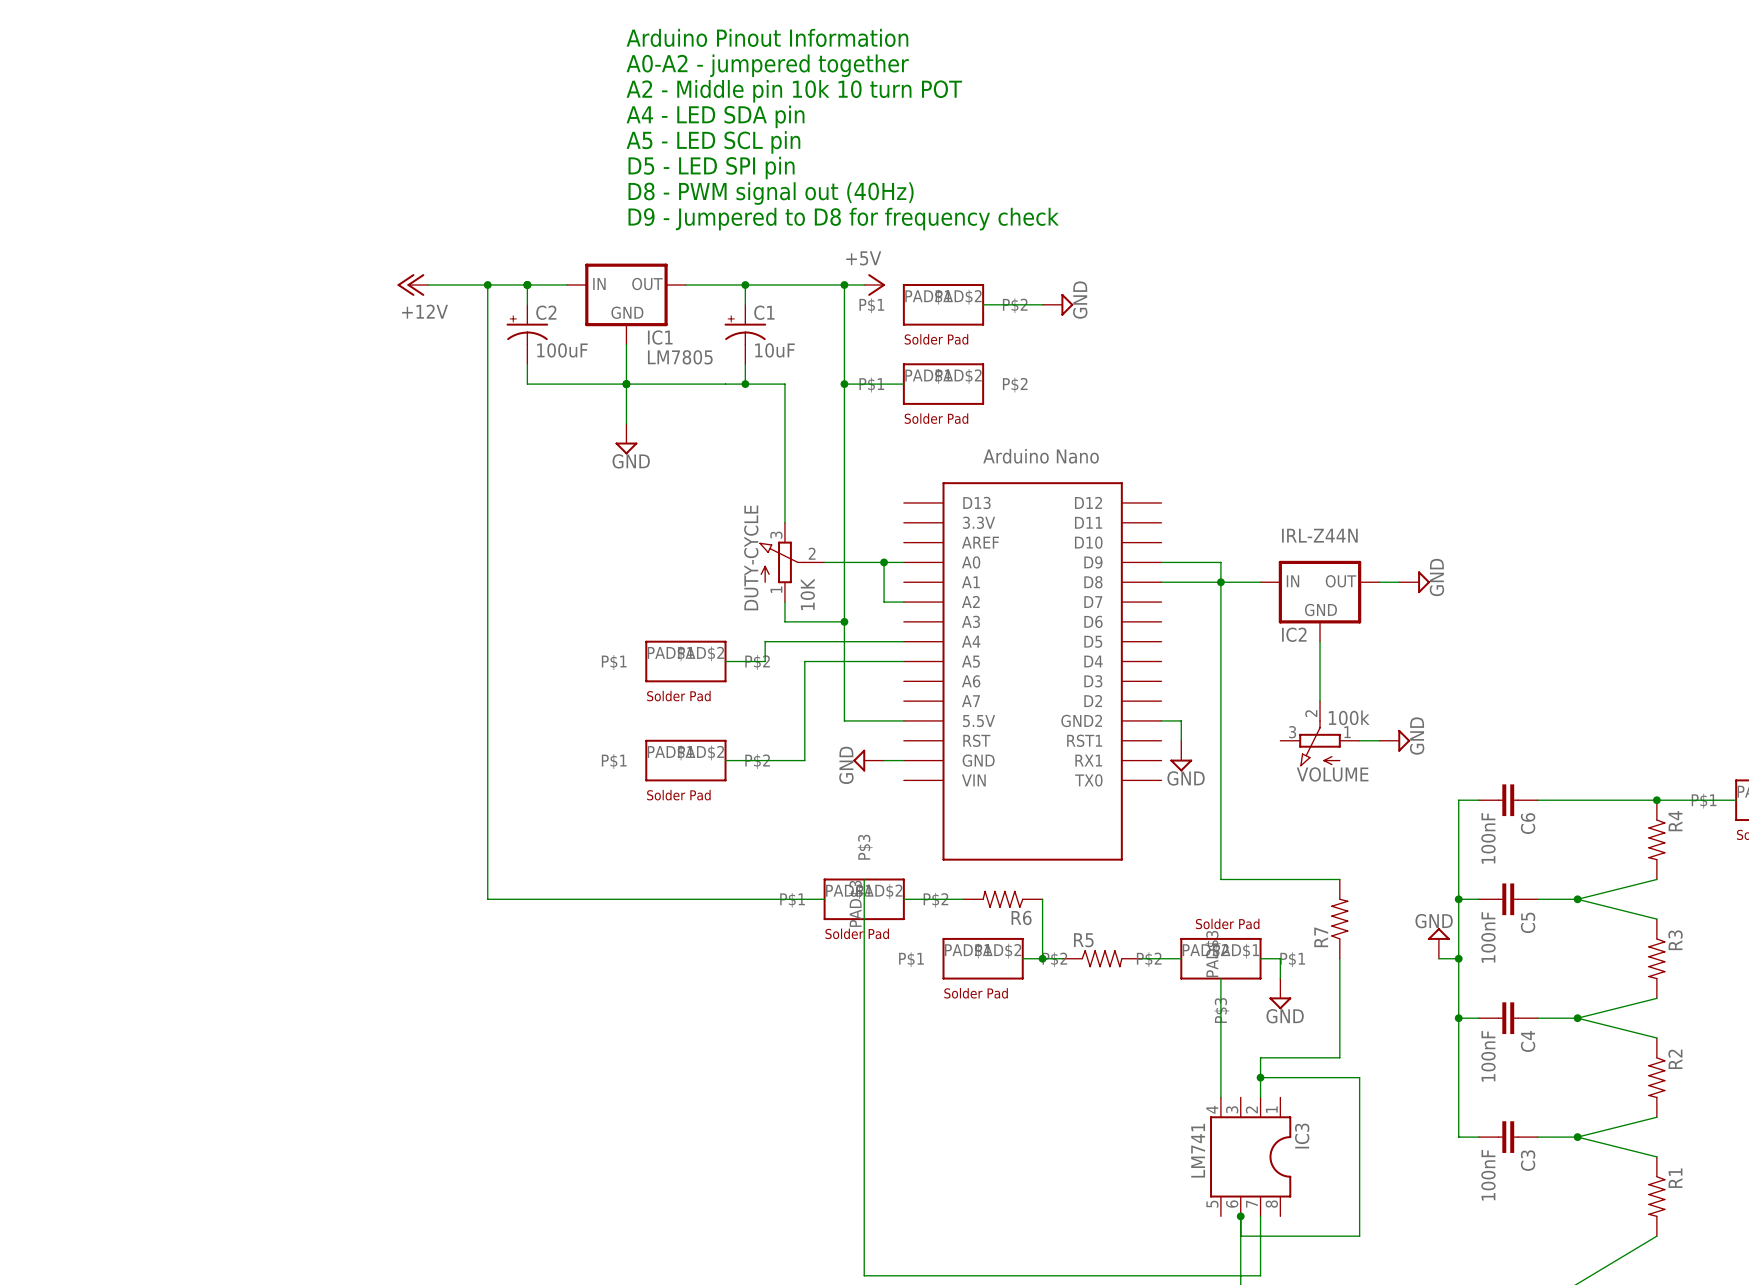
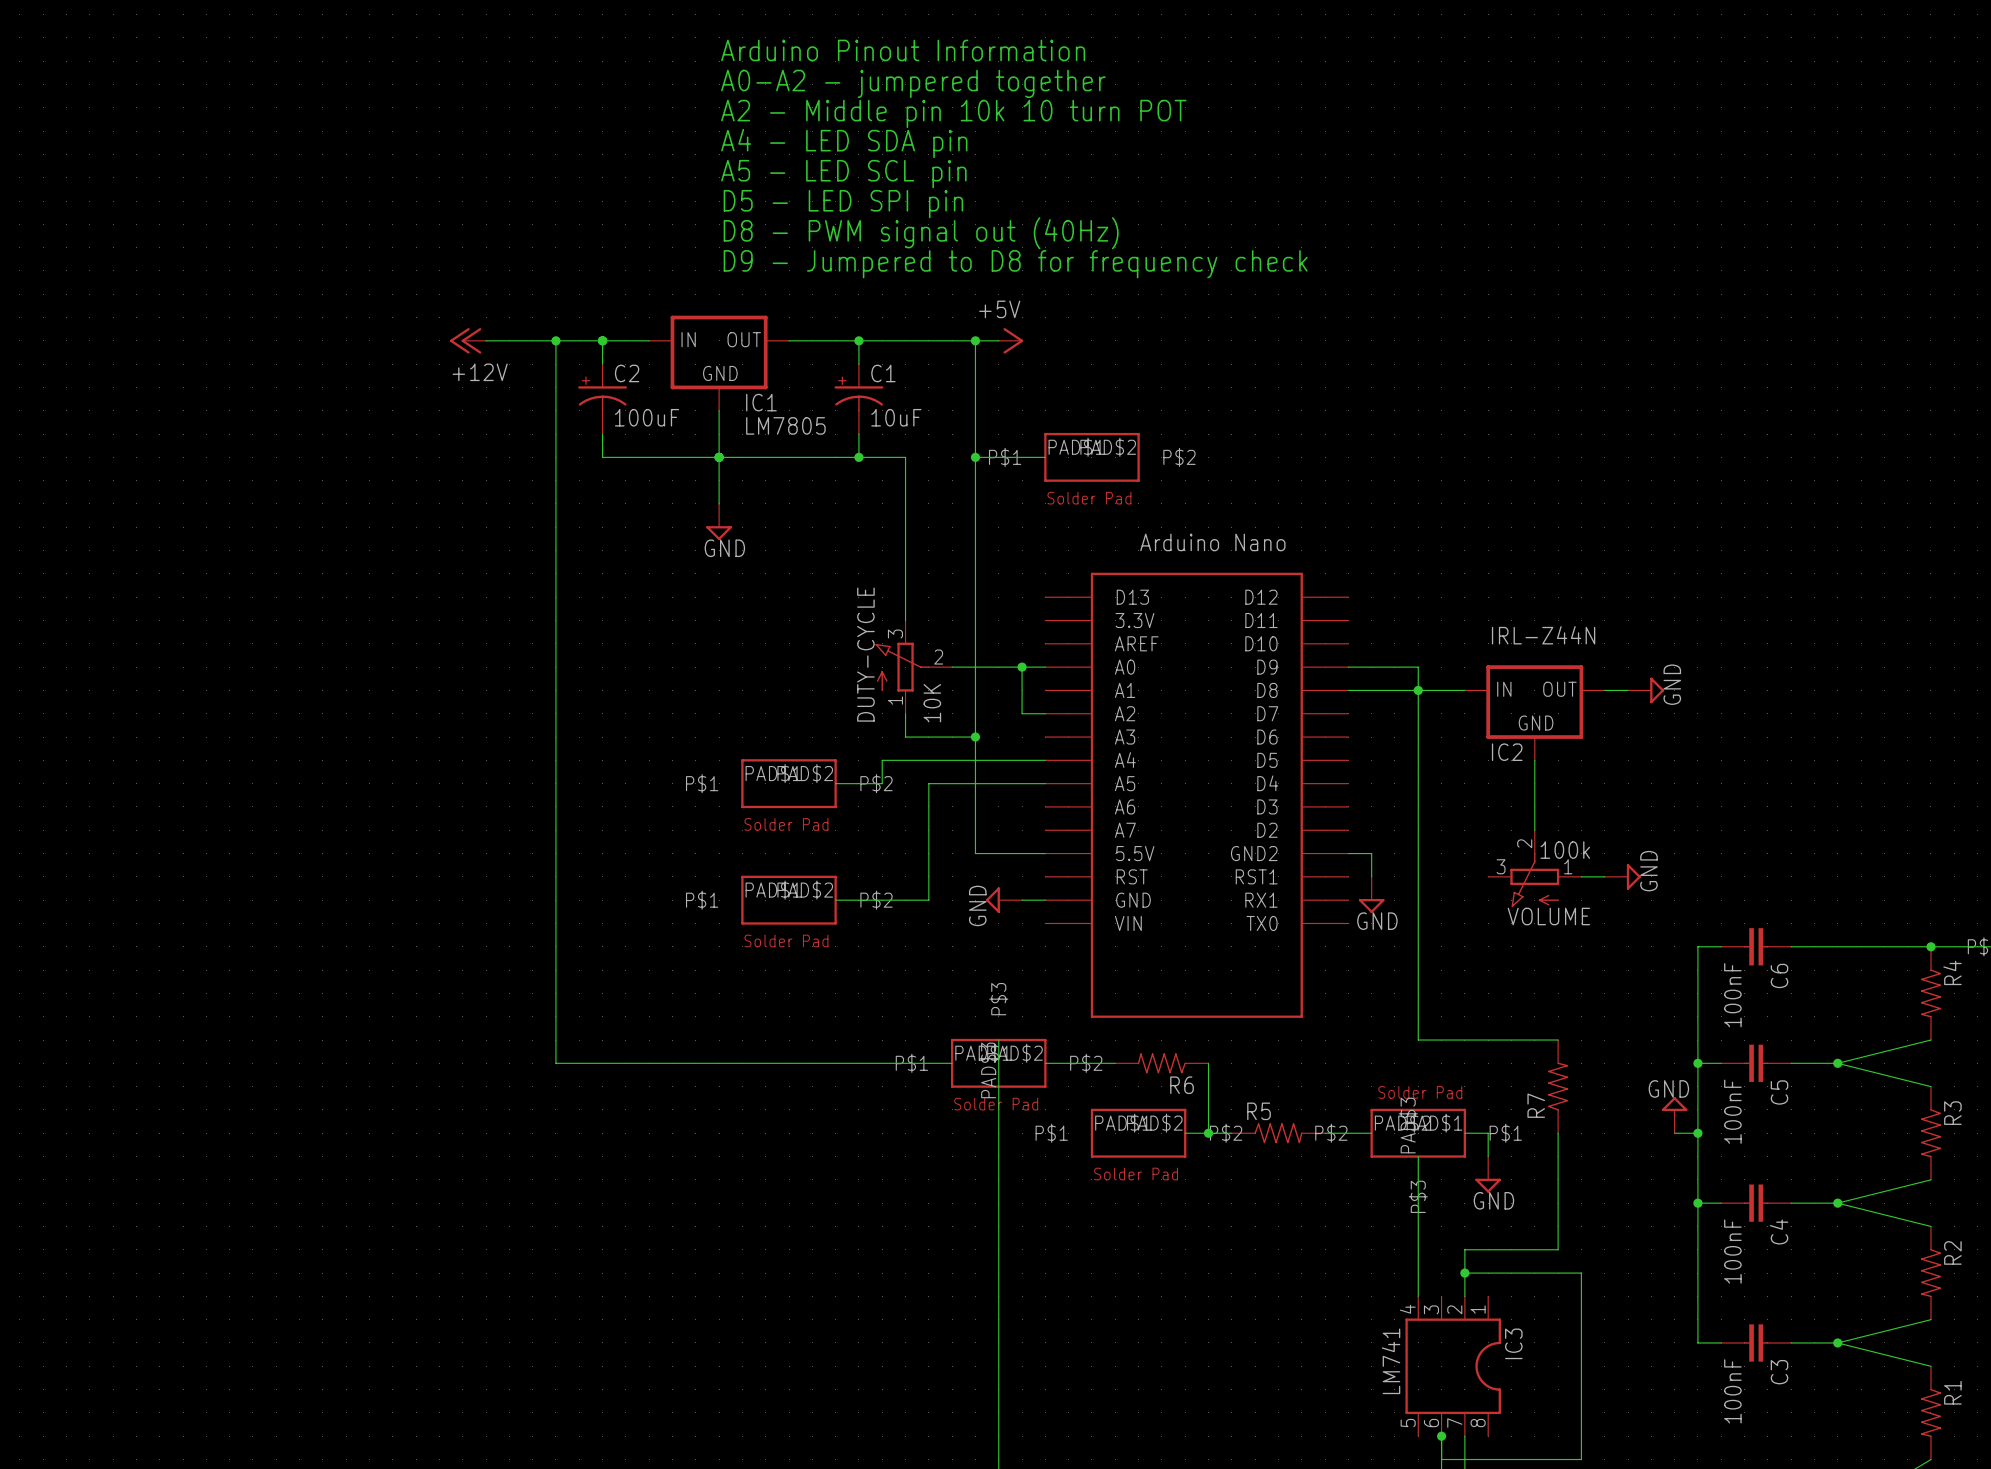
part: (943, 304) -> none
wire: (983, 304) (1042, 304) -> none
power symbol: GND (1057, 304) -> none

